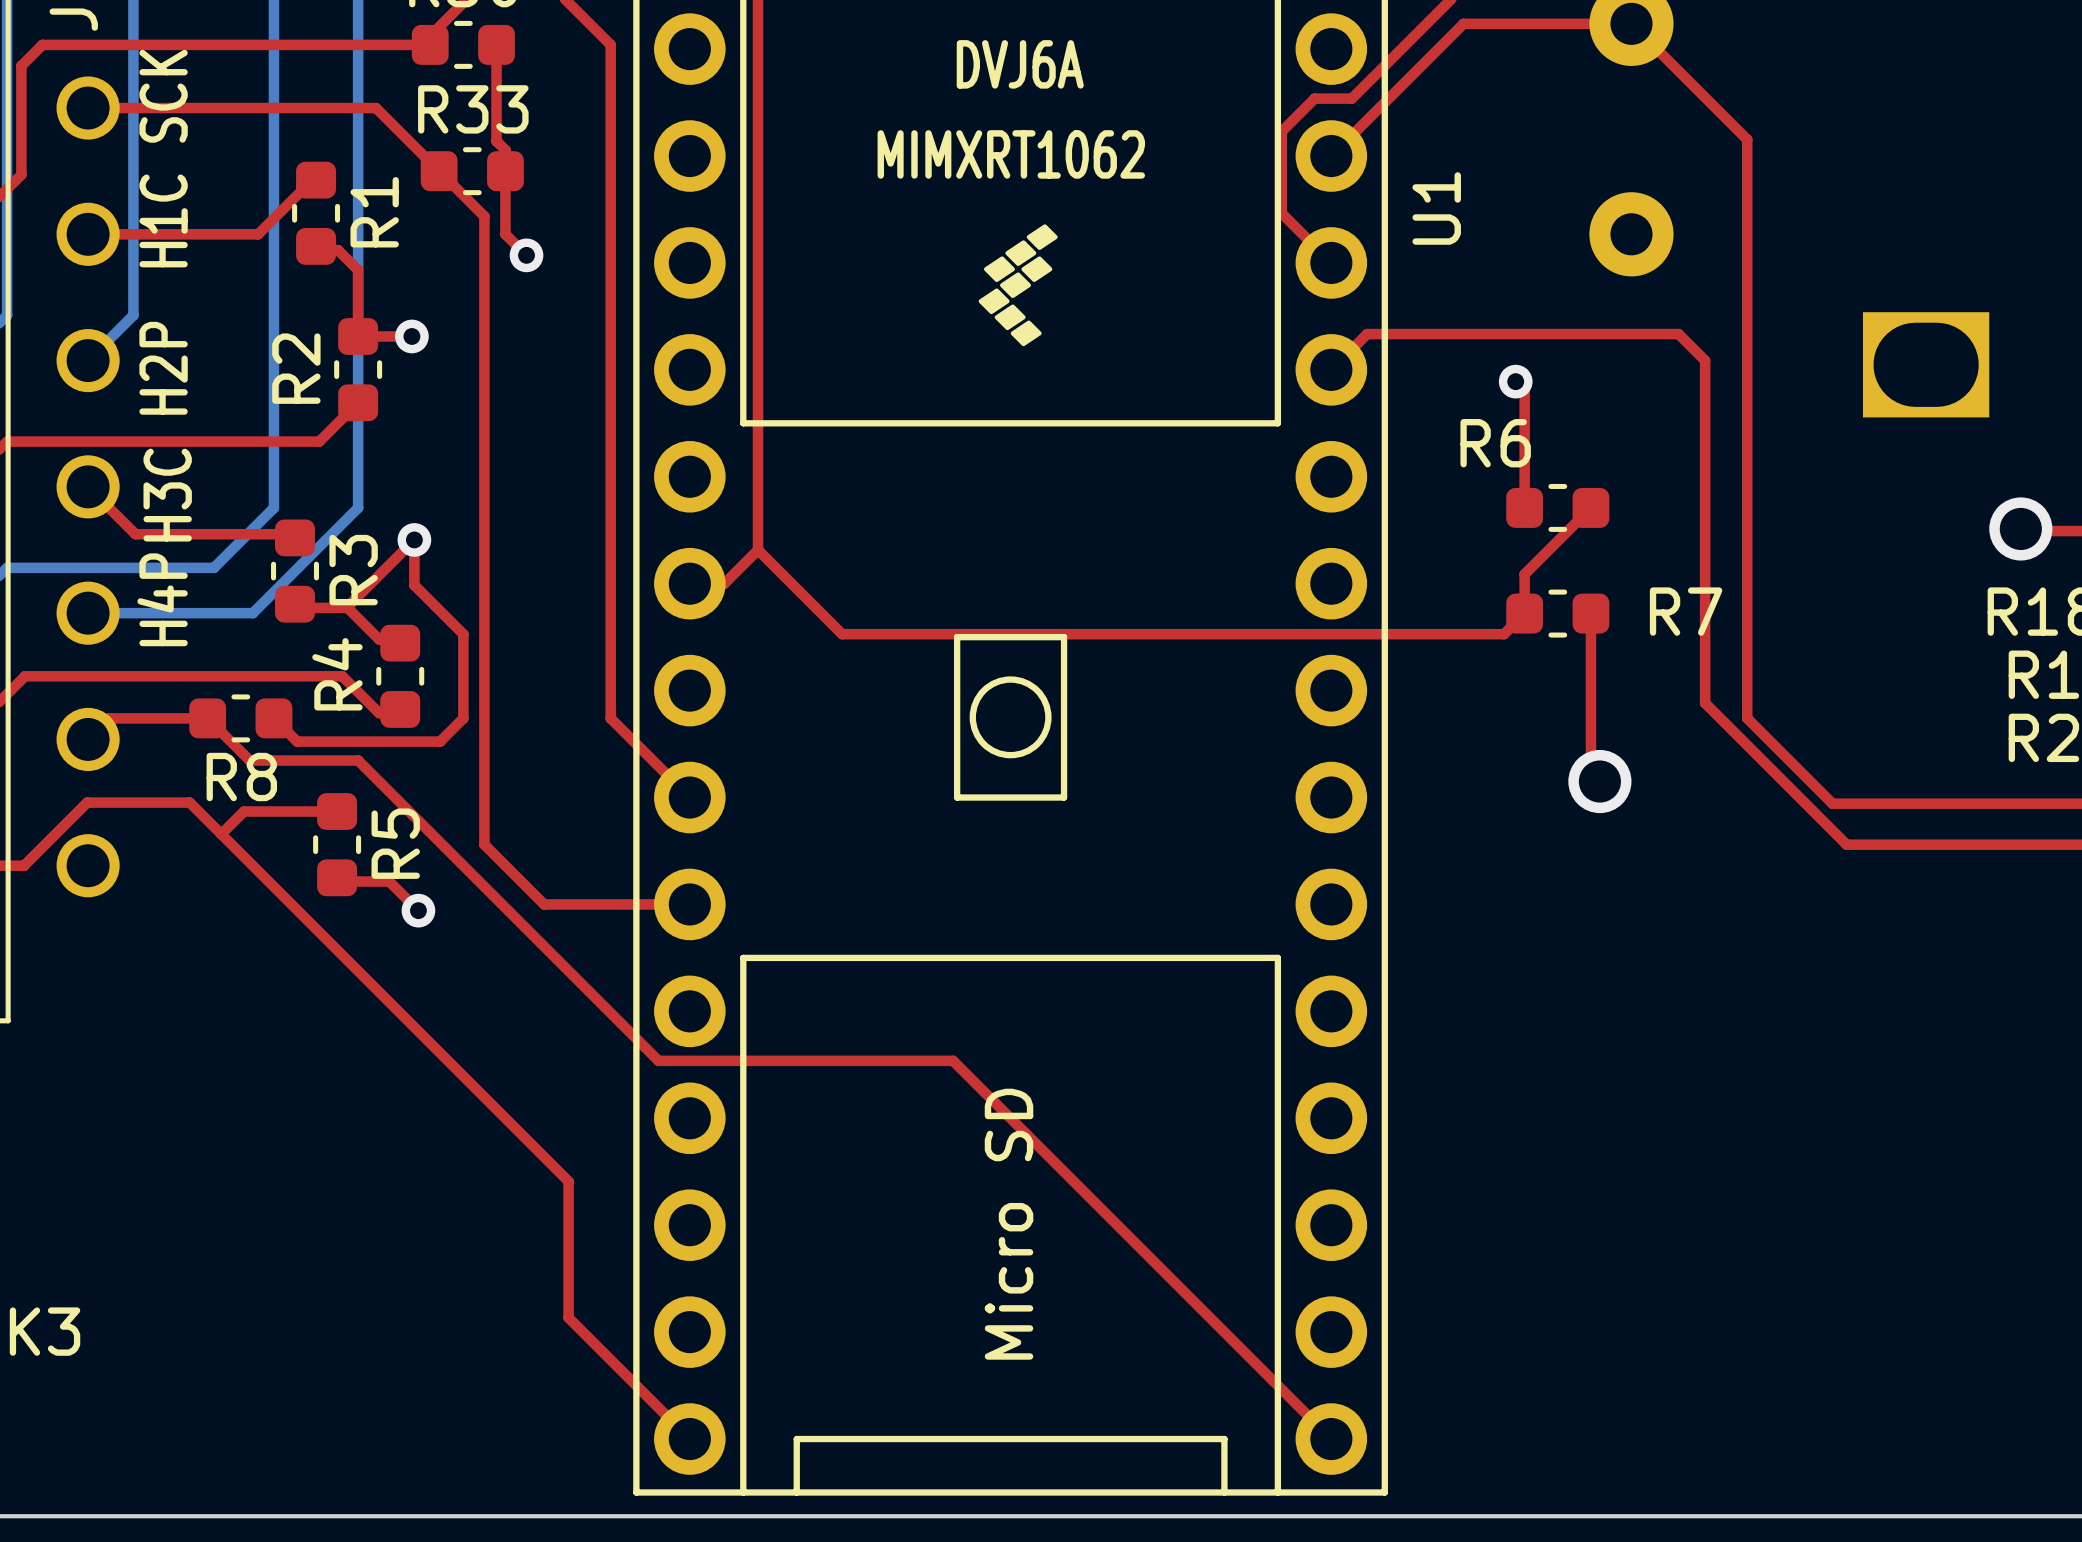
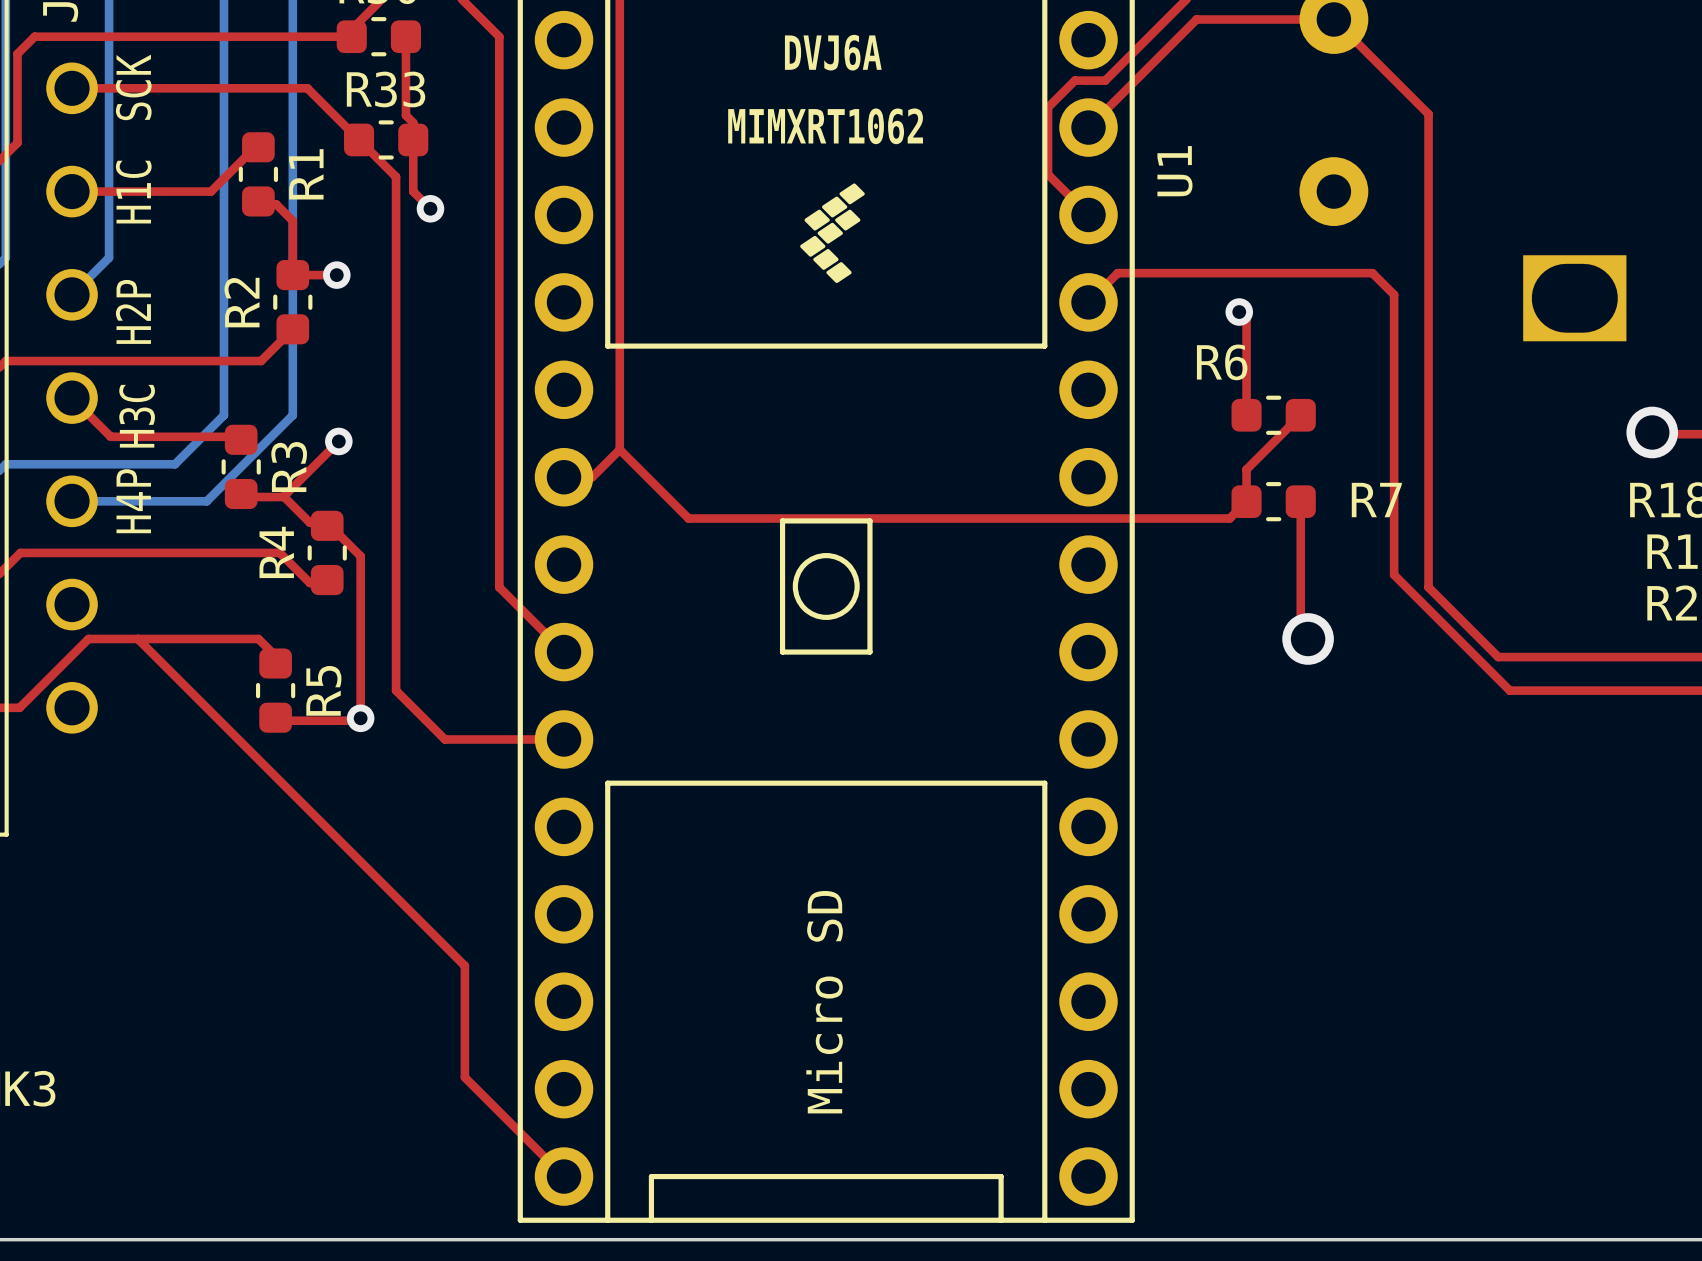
top track: (414, 539) (414, 585) (463, 634) (463, 718) (440, 741) (297, 741) (273, 718) -> none
R8: (240, 718) -> none
top track: (88, 739) (109, 718) (207, 718) (249, 760) (358, 760) (658, 1060) (953, 1060) (1331, 1439) -> none
top track: (87, 802) (189, 802) -> (137, 638) (155, 656)
top track: none -> (71, 656) (88, 638) (258, 638) (275, 656)
top track: (337, 811) (243, 811) (221, 834) -> none
top track: (389, 881) (418, 910) -> (318, 720) (358, 720) (360, 718) (360, 556) (327, 522)
via position: (418, 910) -> (360, 718)

